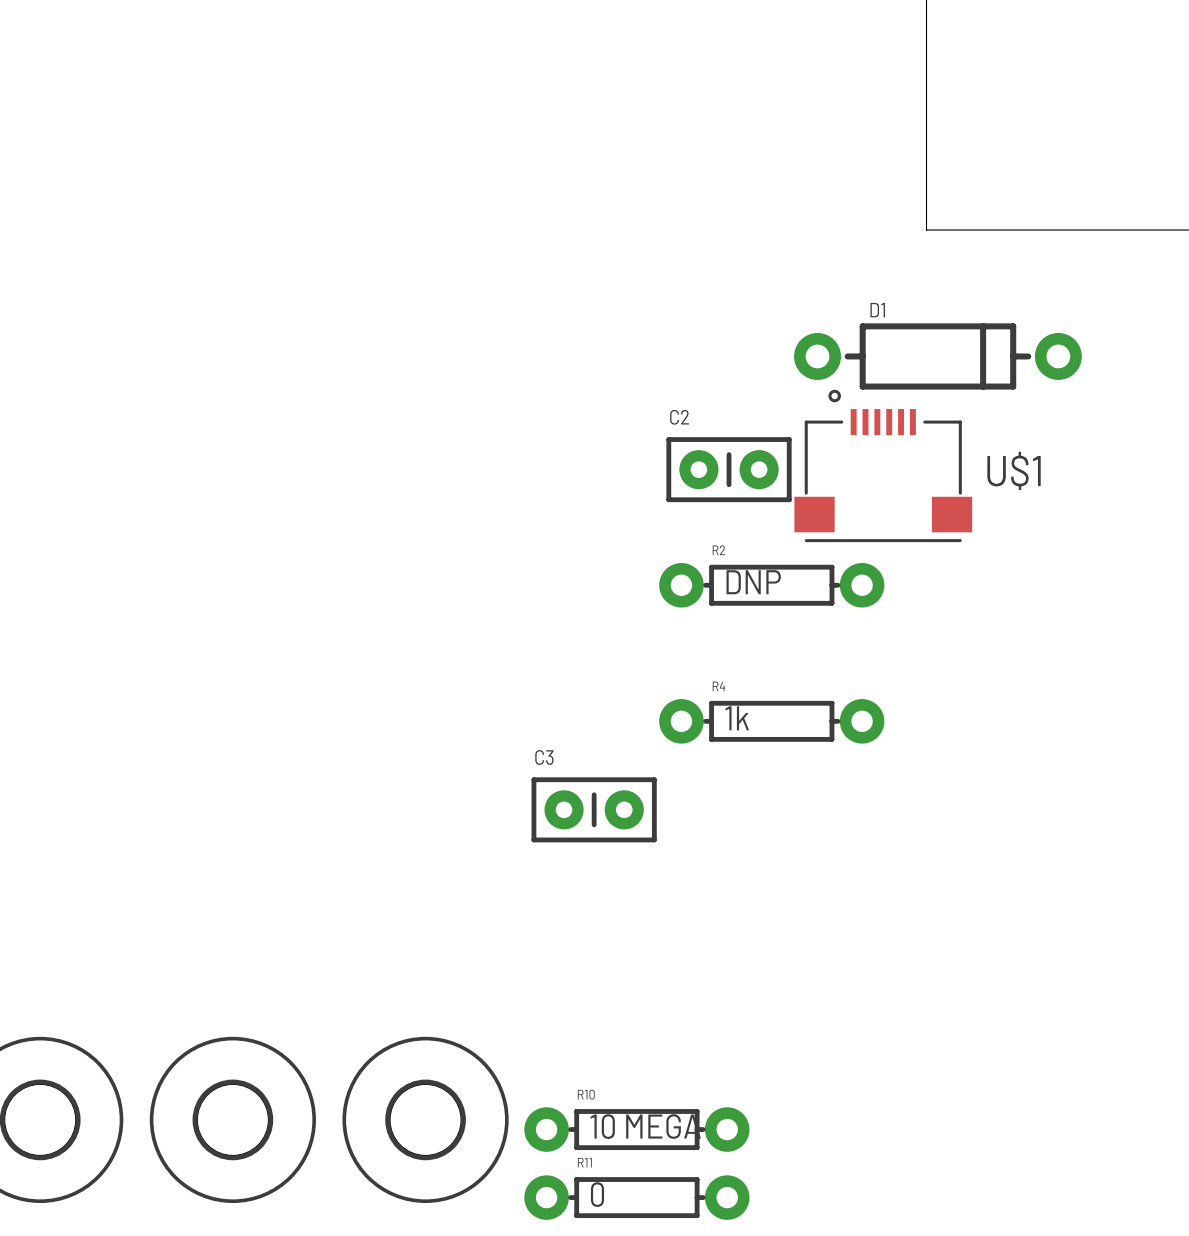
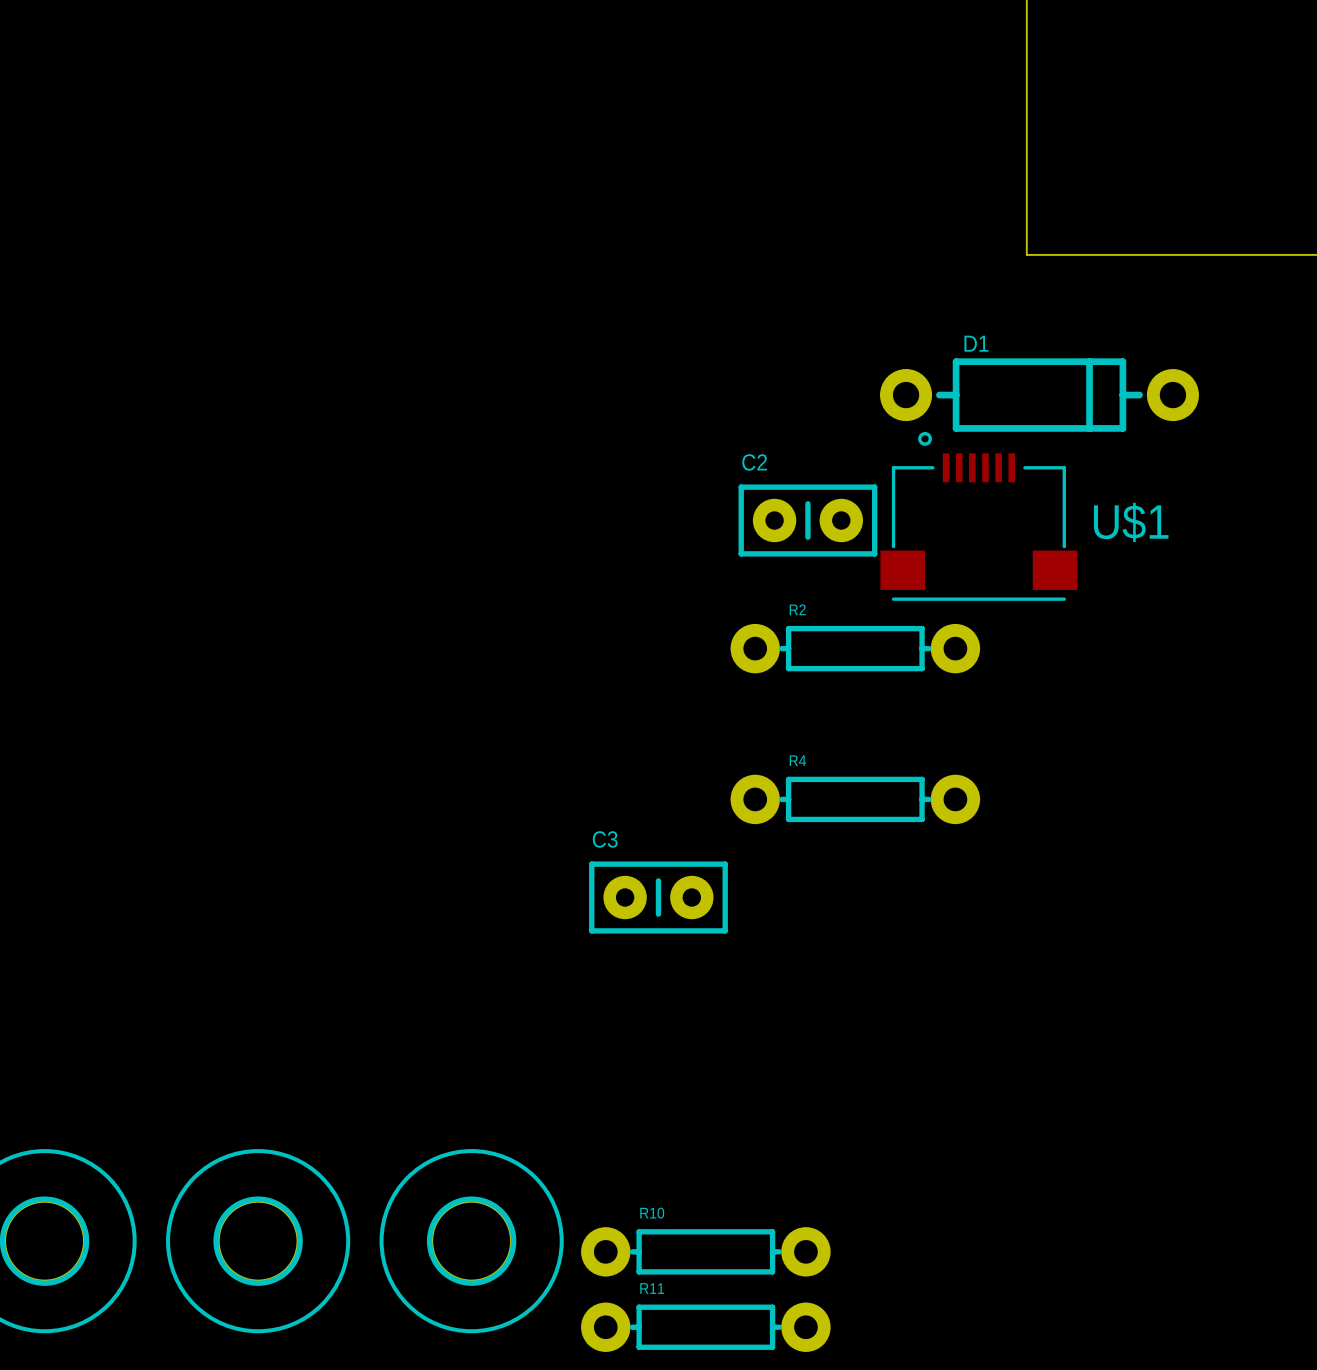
R2 value: DNP (753, 582) -> none
R4 value: 1k (737, 718) -> none
R10 value: 10 MEGA (645, 1126) -> none
R11 value: 0 (597, 1194) -> none

